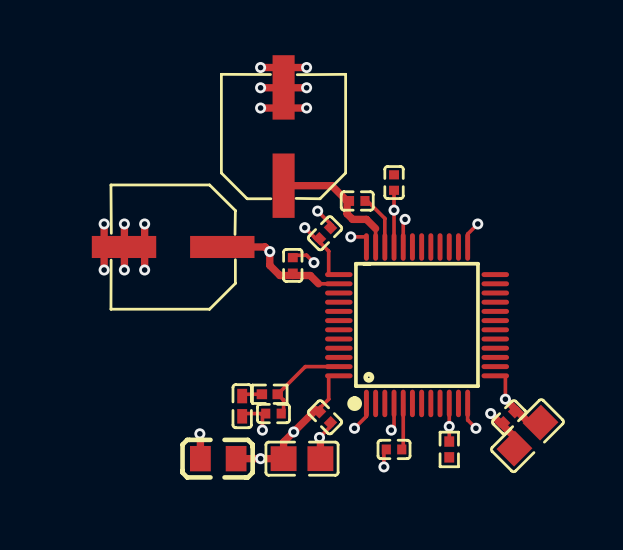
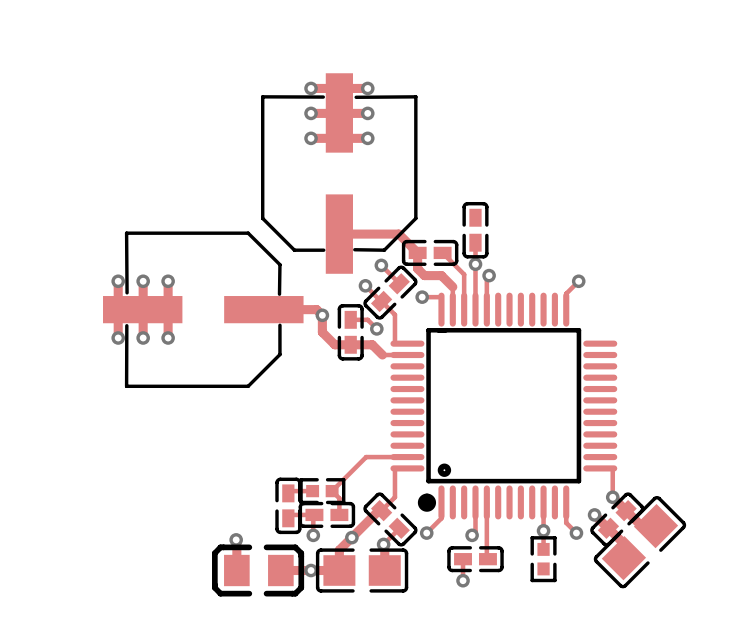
part footprint: [383, 165, 405, 200] -> [462, 201, 489, 259]
part footprint: [339, 190, 375, 212] -> [401, 239, 459, 266]
part footprint: [306, 215, 344, 252] -> [363, 265, 418, 320]
part footprint: [282, 247, 304, 283] -> [337, 304, 364, 361]
part footprint: [306, 399, 344, 436] -> [363, 492, 418, 547]
part footprint: [491, 399, 528, 436] -> [590, 492, 645, 547]
part footprint: [256, 402, 291, 425] -> [298, 501, 356, 528]
part footprint: [376, 438, 412, 461] -> [447, 546, 504, 573]

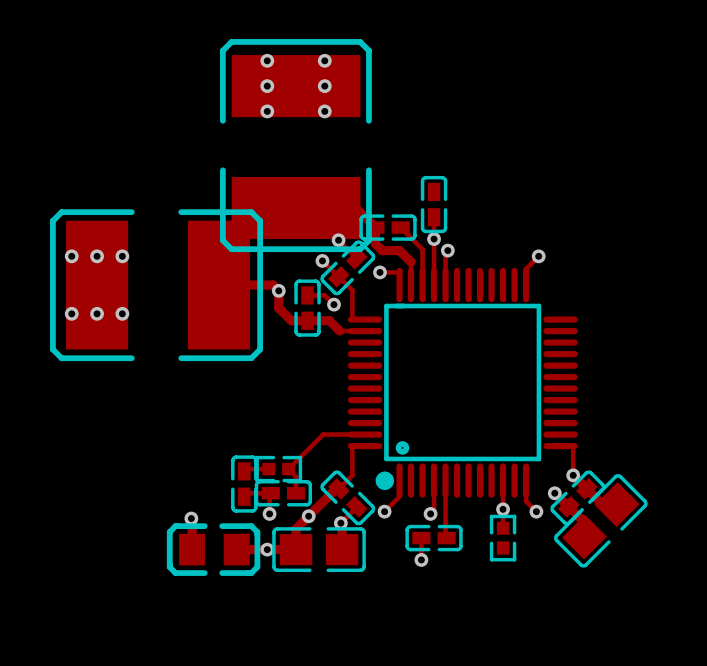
part footprint: [261, 73, 418, 274] -> [220, 39, 372, 253]
part footprint: [103, 231, 304, 389] -> [50, 209, 264, 362]

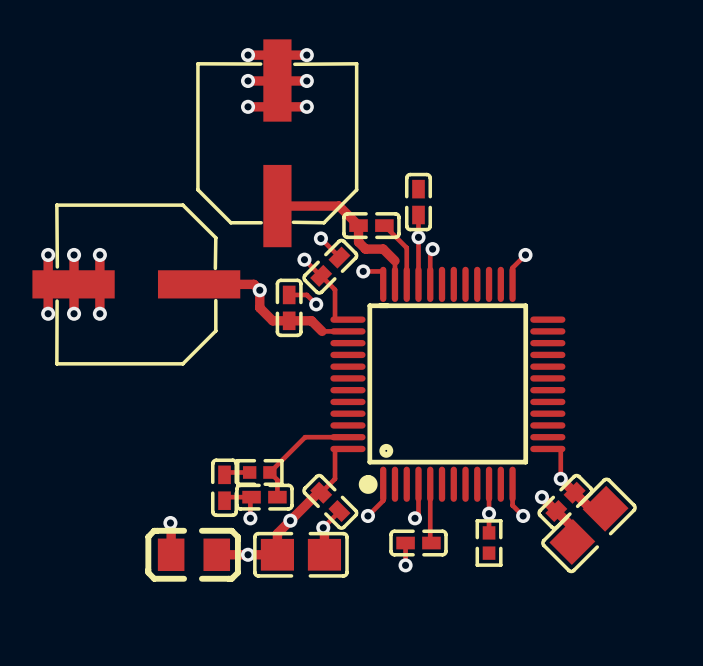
part footprint: [220, 39, 372, 253] -> [196, 39, 359, 248]
part footprint: [50, 209, 264, 362] -> [32, 203, 241, 366]

